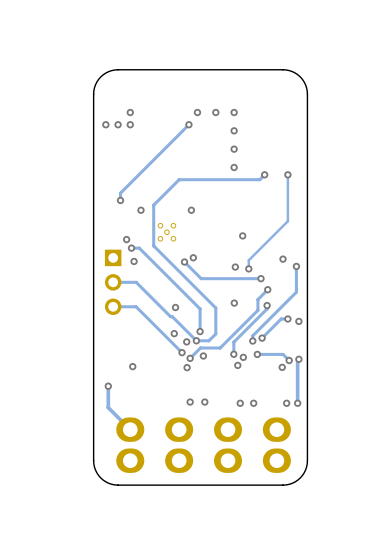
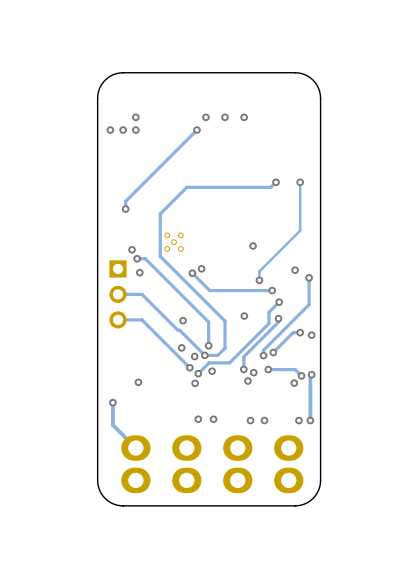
via: (234, 130) -> none
via: (234, 149) -> none
via: (234, 167) -> none
via: (140, 210) -> none
via: (191, 210) -> none
via: (235, 267) -> none

